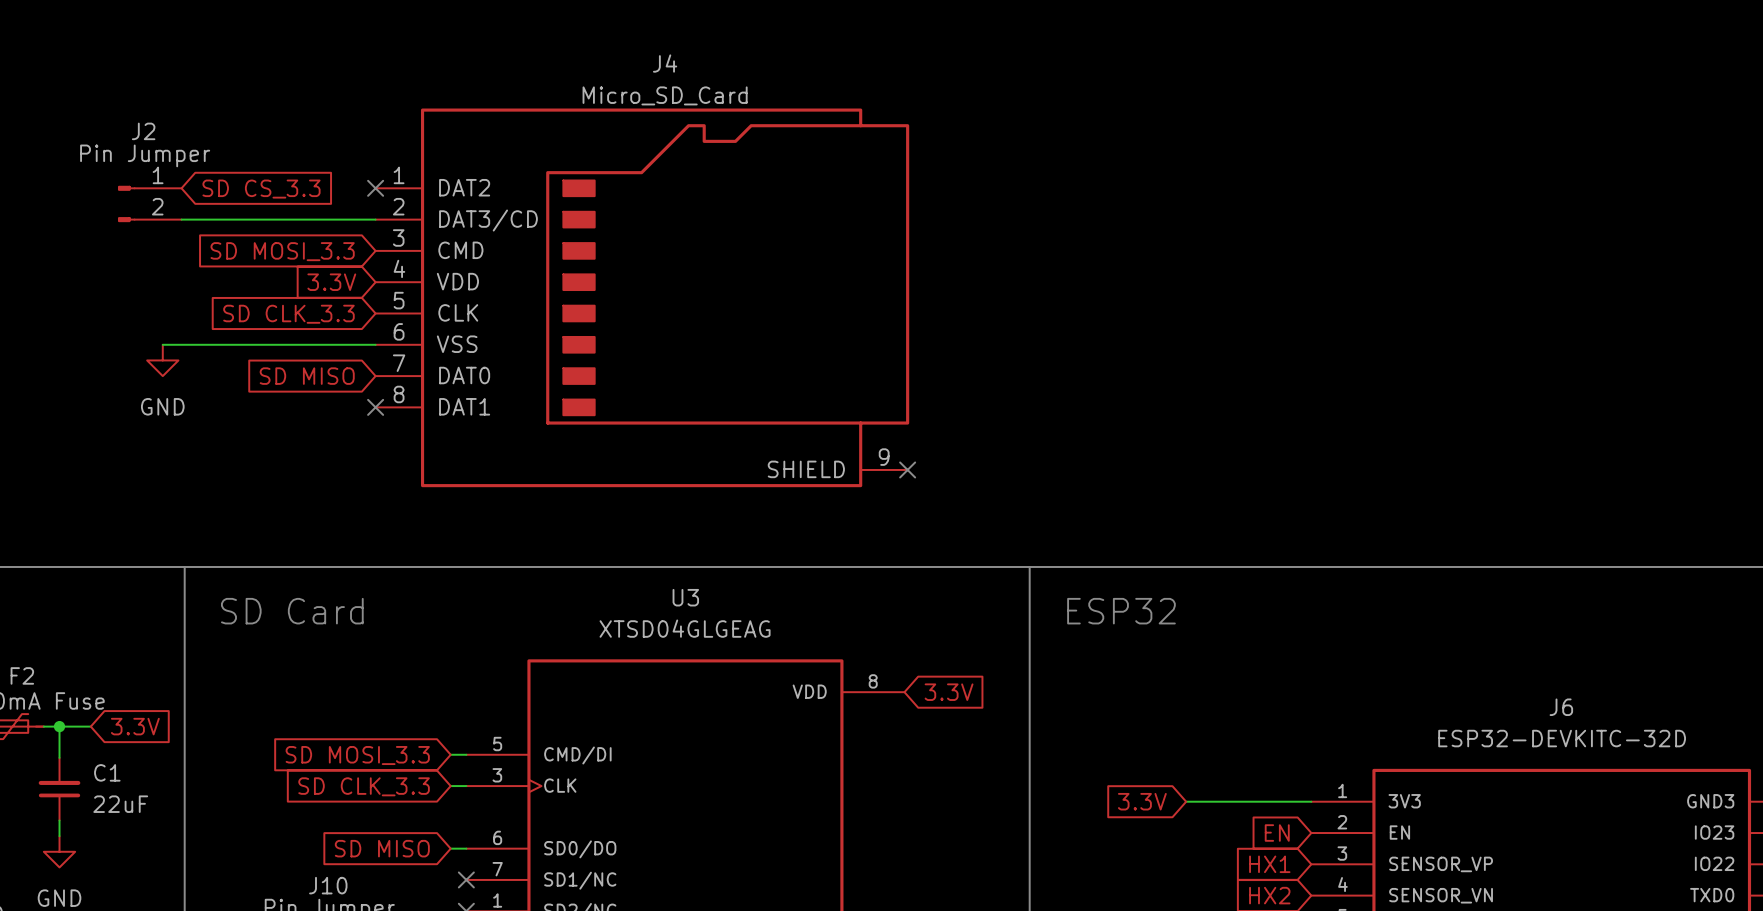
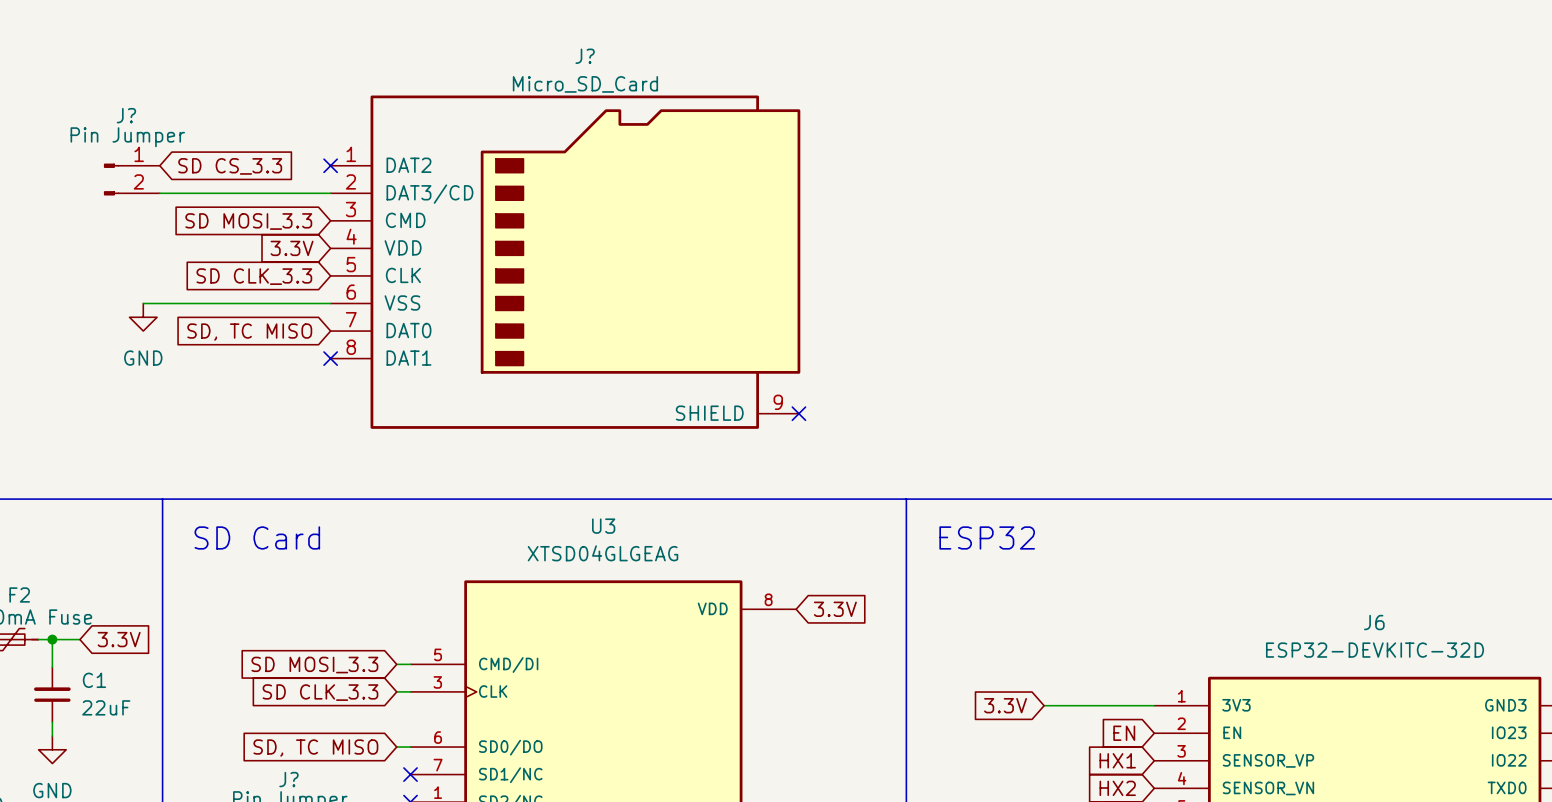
J4 name: J4 (665, 63) -> J? (585, 56)
J2 name: J2 (143, 131) -> J? (126, 115)
global label: SD MISO (307, 376) -> SD, TC MISO (249, 332)
global label: SD MISO (382, 848) -> SD, TC MISO (315, 748)
J10 name: J10 (328, 885) -> J? (288, 779)

